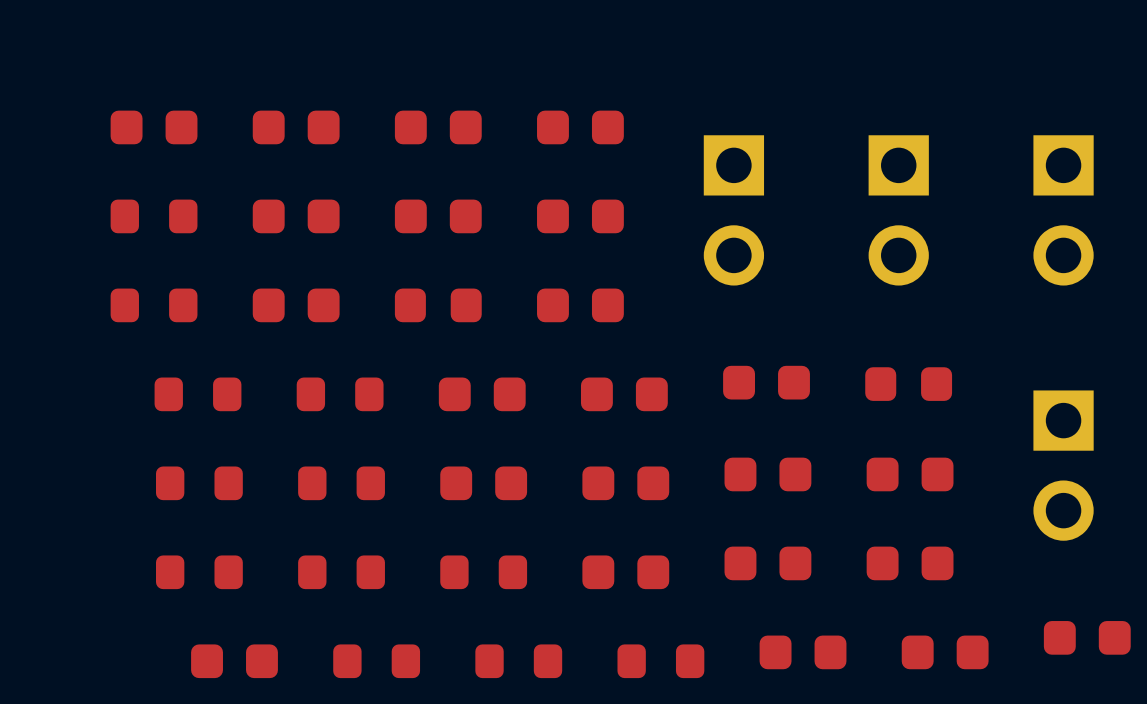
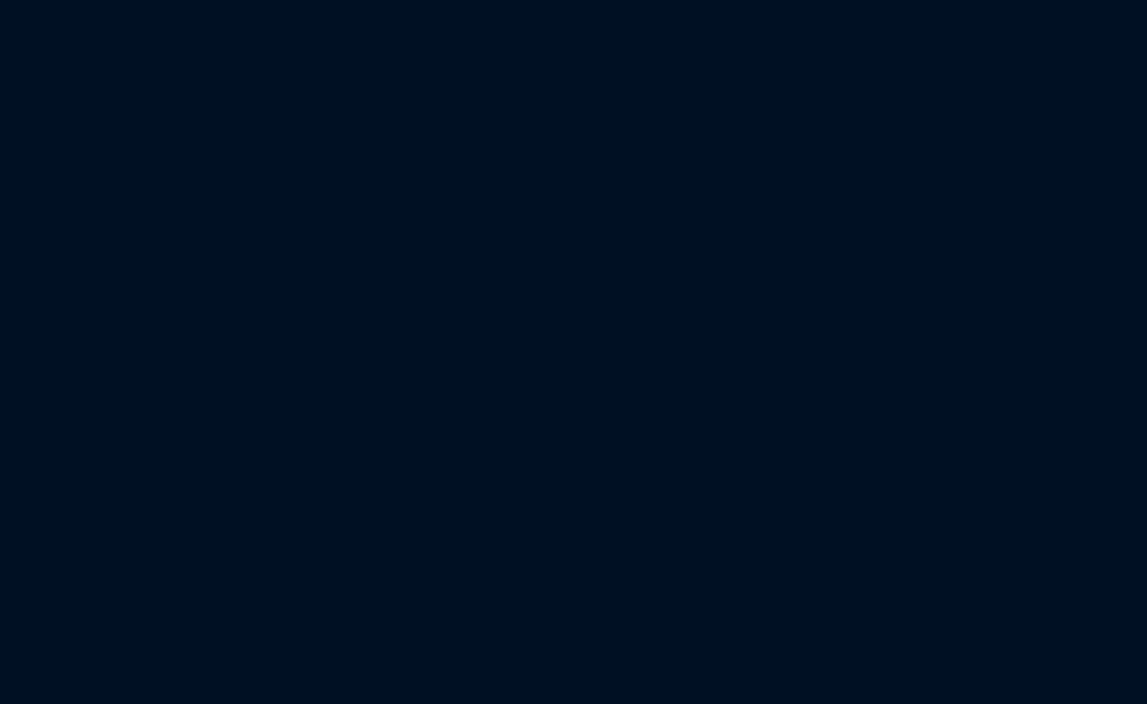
part: (154, 127) -> none
part: (296, 127) -> none
part: (438, 127) -> none
part: (580, 127) -> none
part: (733, 210) -> none
part: (898, 210) -> none
part: (1063, 210) -> none
part: (154, 216) -> none
part: (296, 216) -> none
part: (438, 216) -> none
part: (580, 216) -> none
part: (154, 305) -> none
part: (296, 305) -> none
part: (438, 305) -> none
part: (580, 305) -> none
part: (766, 382) -> none
part: (908, 384) -> none
part: (197, 394) -> none
part: (340, 394) -> none
part: (482, 394) -> none
part: (624, 394) -> none
part: (1063, 465) -> none
part: (767, 474) -> none
part: (910, 474) -> none
part: (199, 483) -> none
part: (341, 483) -> none
part: (483, 483) -> none
part: (625, 483) -> none
part: (767, 563) -> none
part: (910, 563) -> none
part: (199, 572) -> none
part: (341, 572) -> none
part: (483, 572) -> none
part: (625, 572) -> none
part: (1087, 637) -> none
part: (803, 652) -> none
part: (945, 652) -> none
part: (234, 661) -> none
part: (376, 661) -> none
part: (518, 661) -> none
part: (660, 661) -> none

